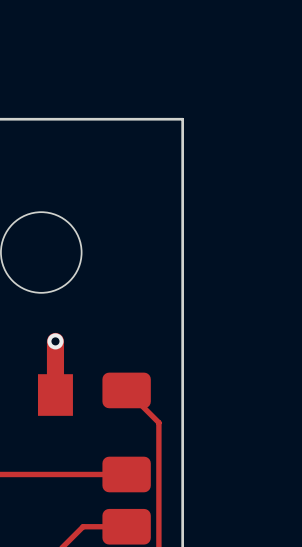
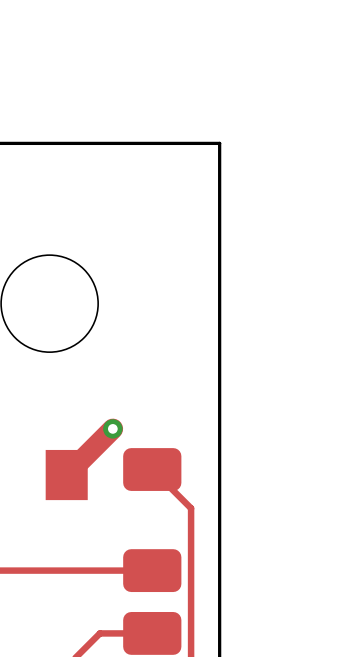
top track: (55, 341) (55, 395) -> (112, 428) (66, 475)
via position: (55, 341) -> (112, 428)

